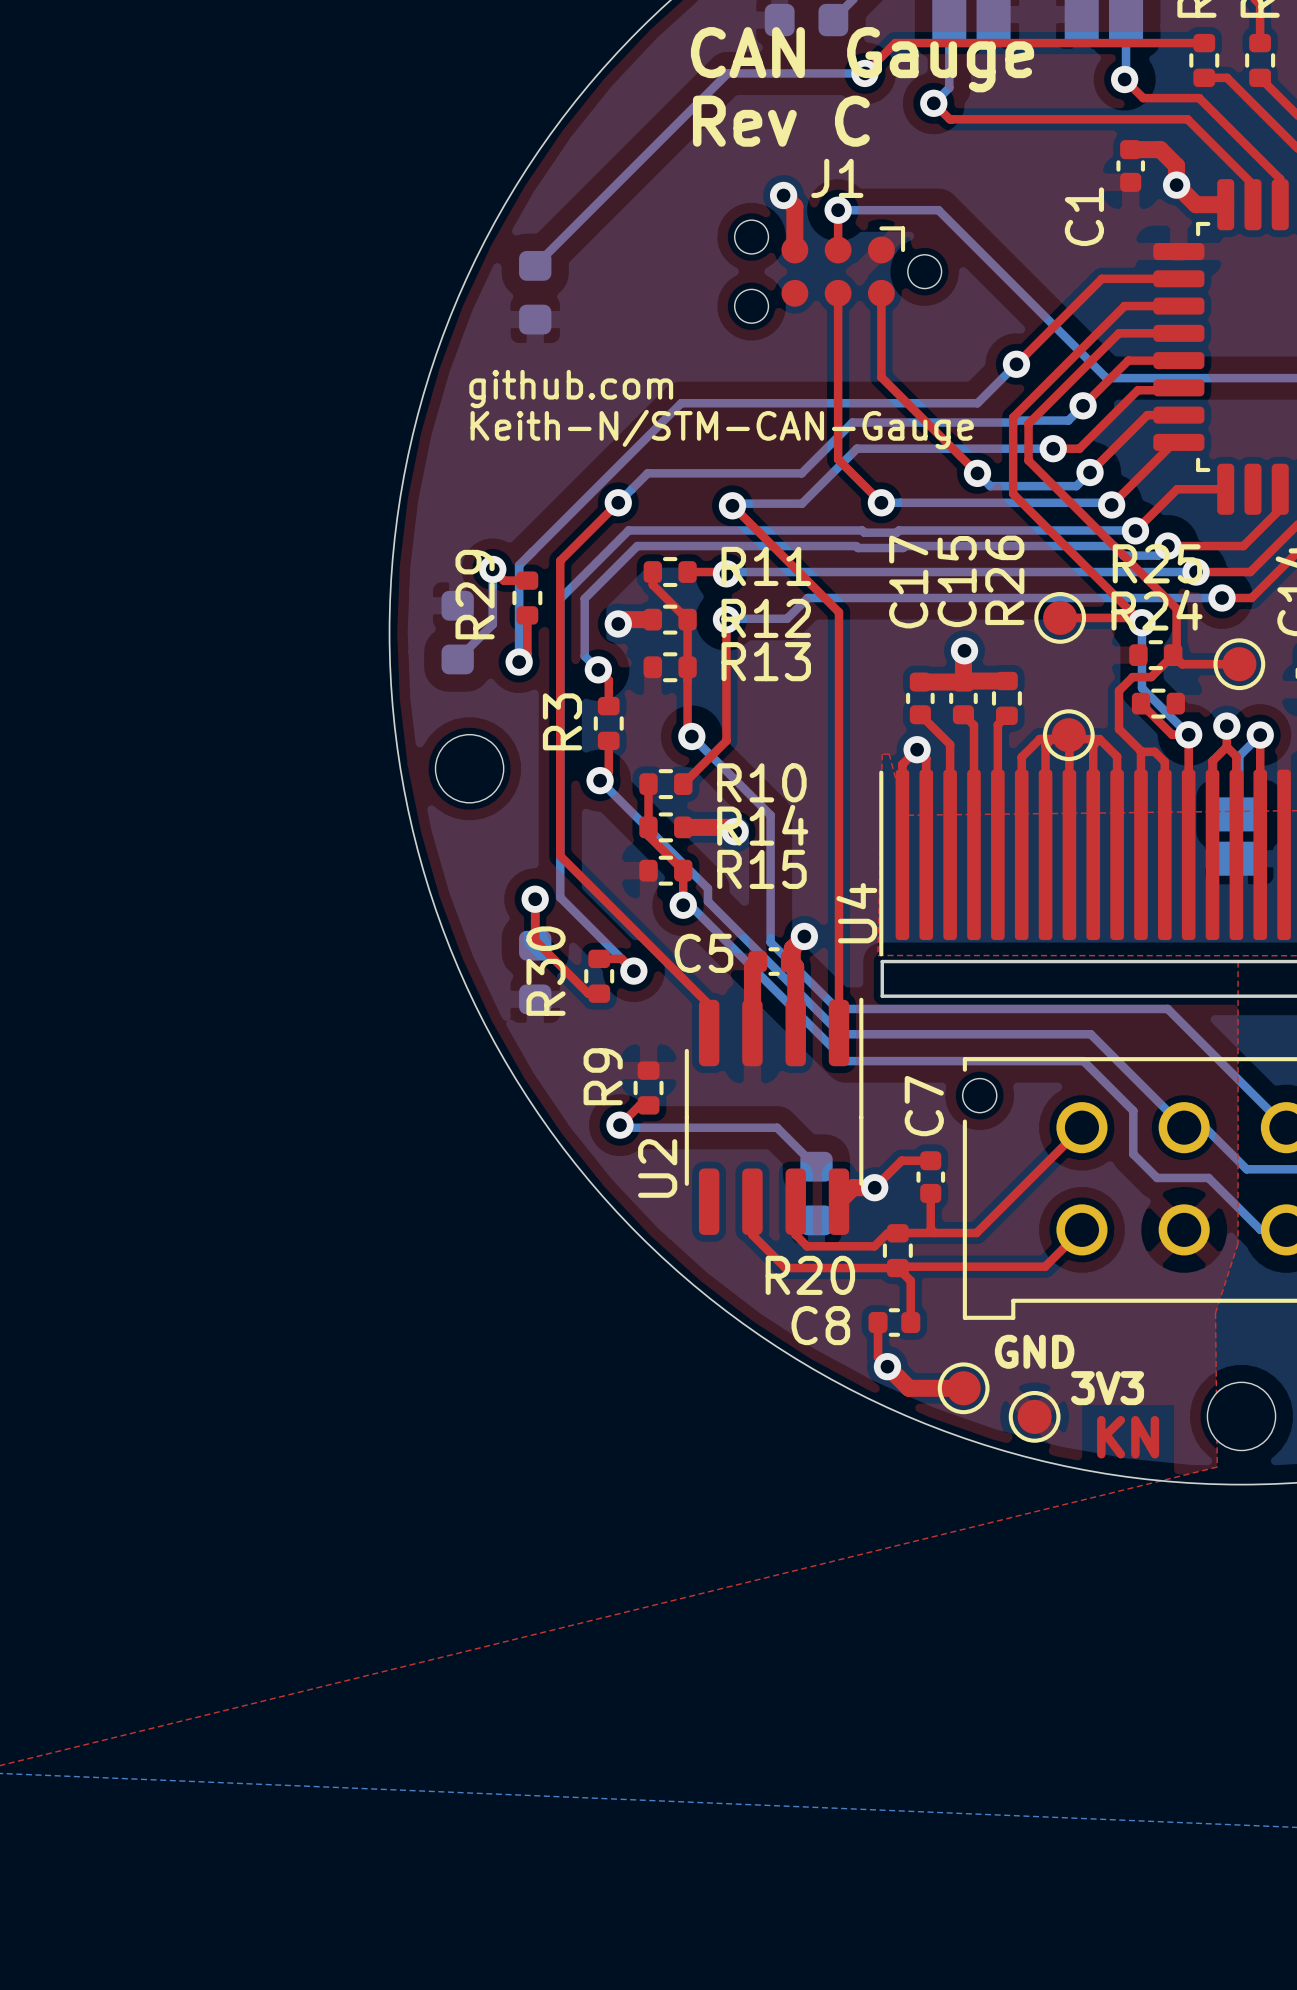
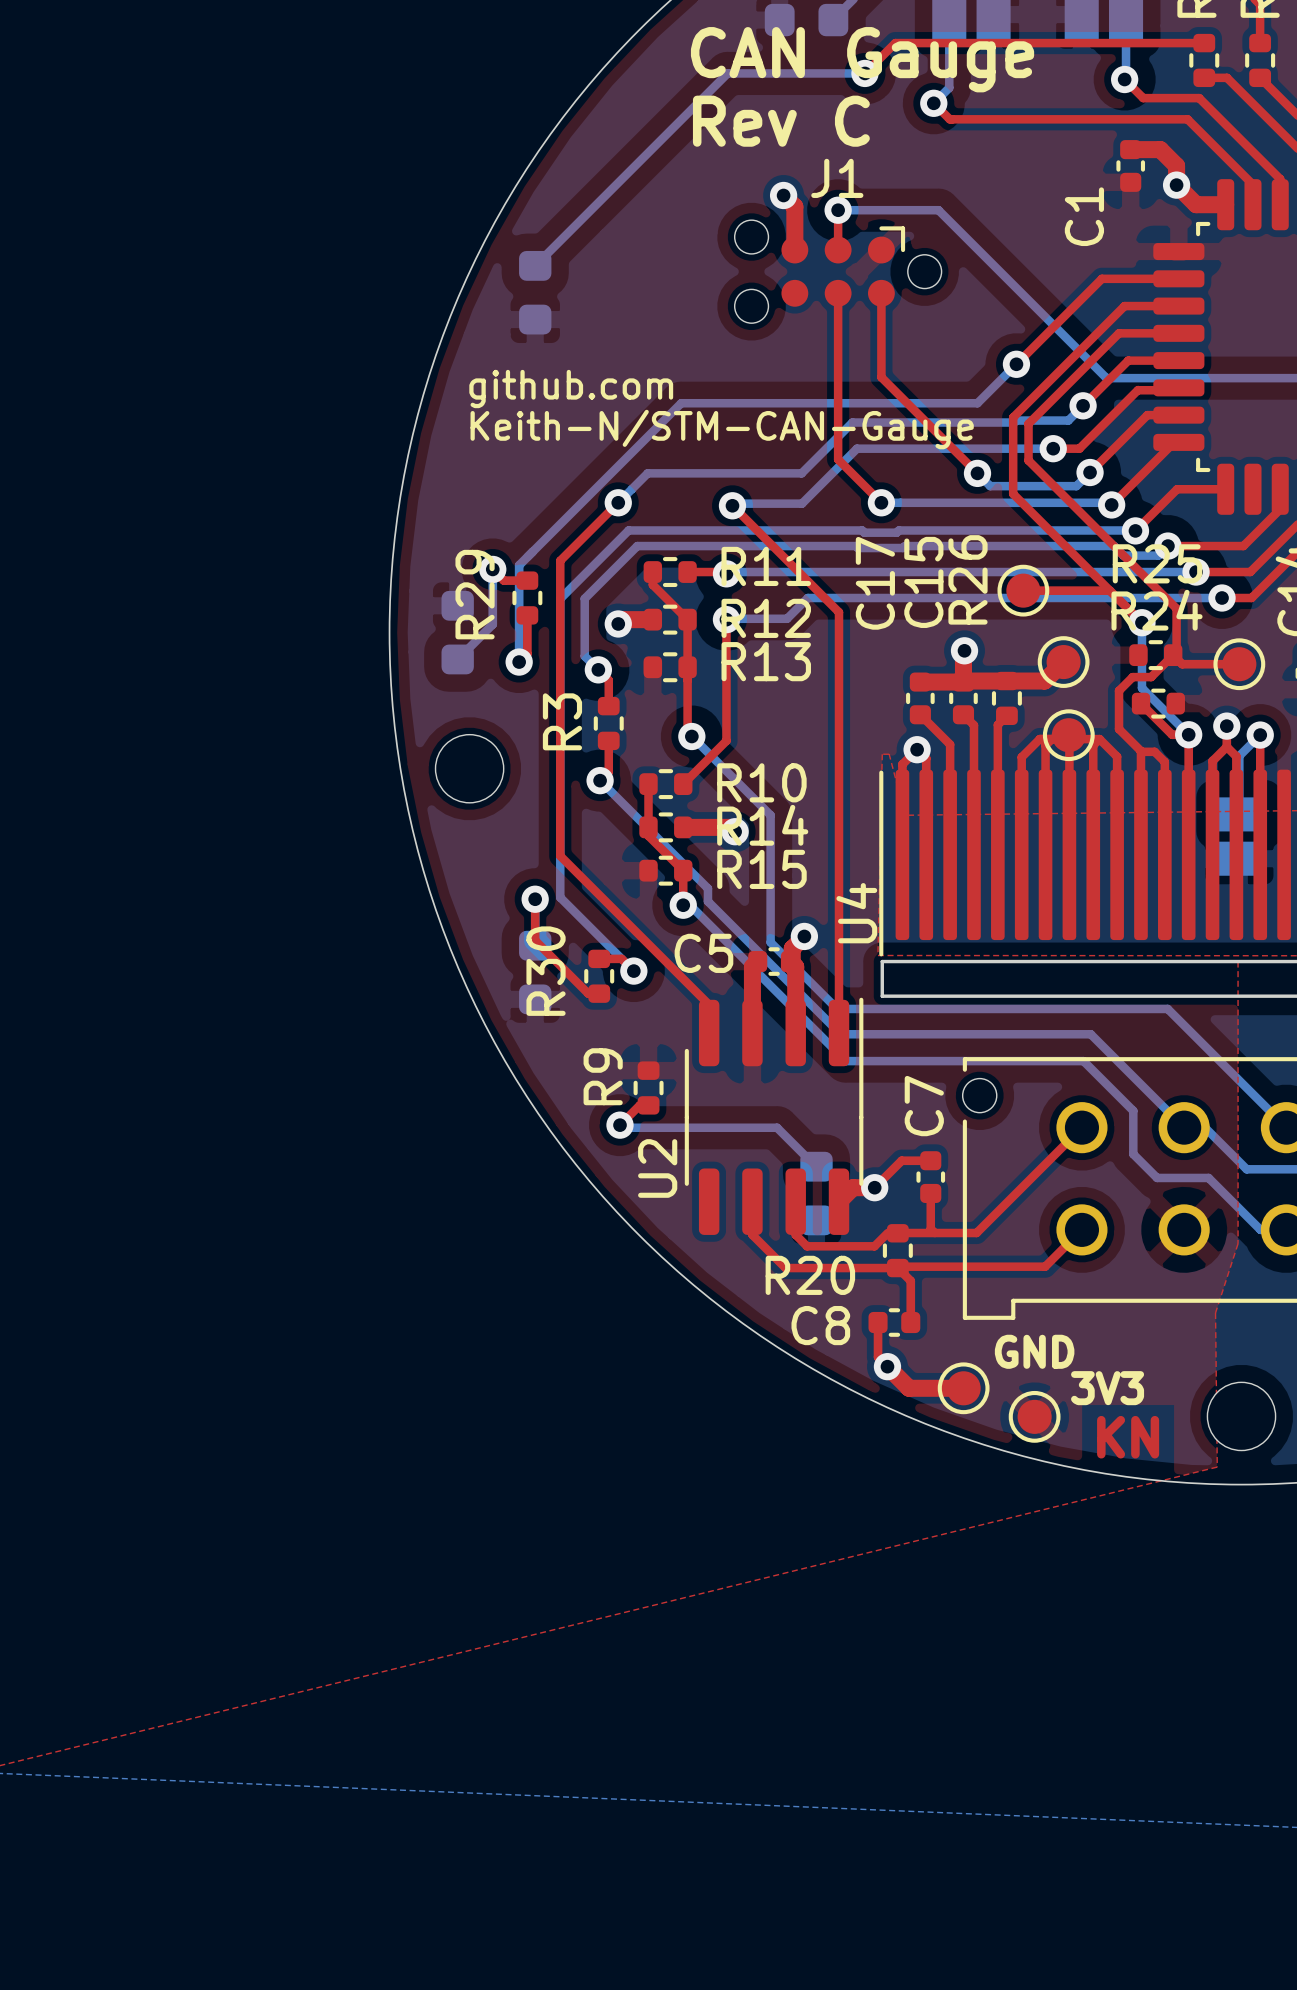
R26 name position: R26 (1004, 580) -> R26 (968, 579)
C15 name position: C15 (957, 581) -> C15 (923, 582)
C17 name position: C17 (908, 582) -> C17 (875, 583)
part: none -> (1023, 590)
top track: (1060, 617) (1137, 617) -> (1023, 590) (1109, 590) (1137, 617)
part: (1060, 617) -> none
top track: none -> (1063, 662) (1044, 681) (1006, 681)
part: none -> (1063, 662)

